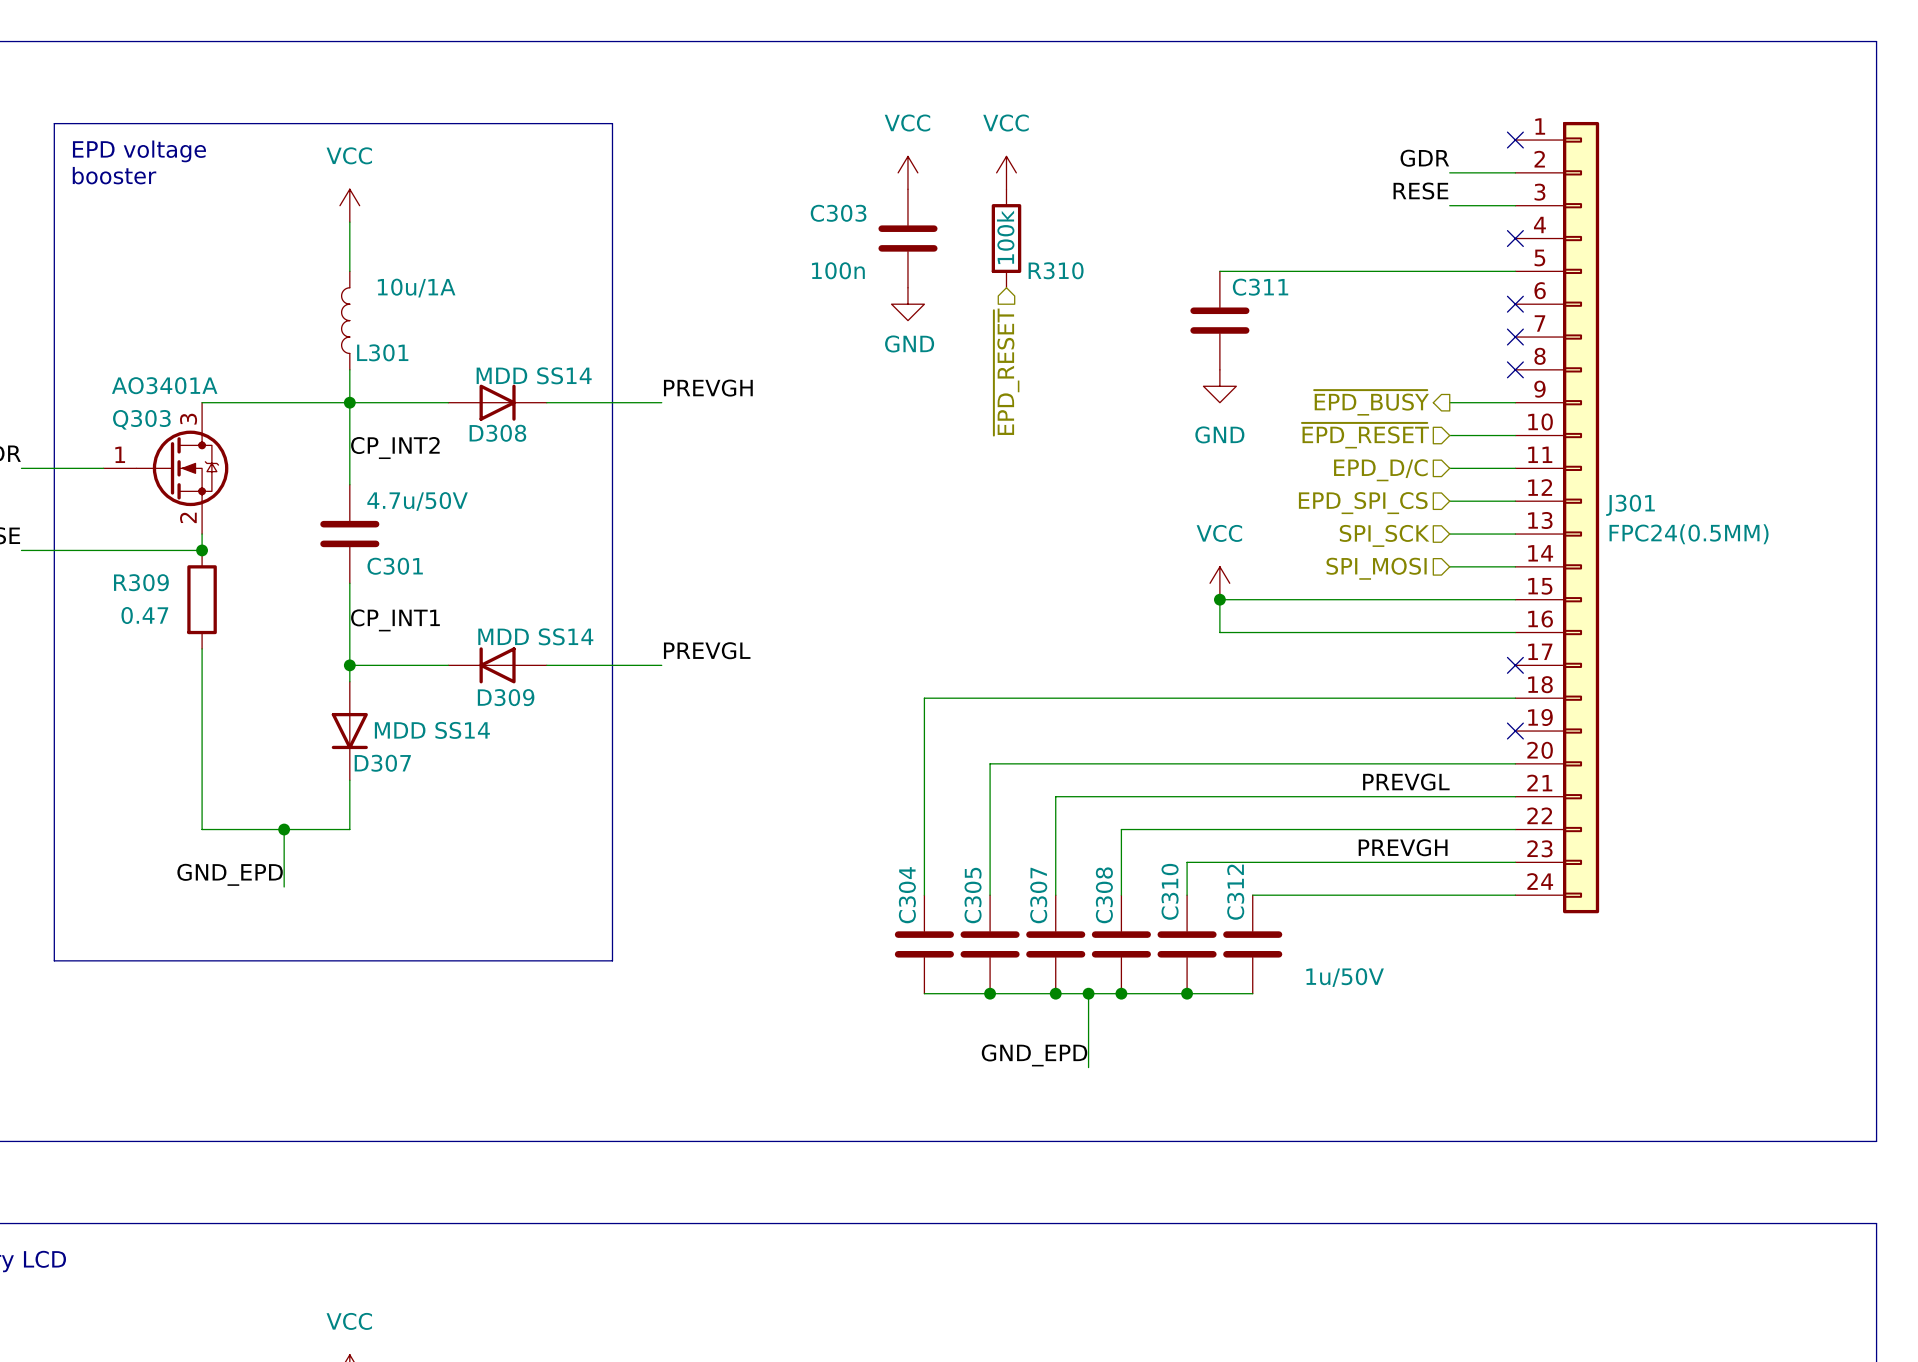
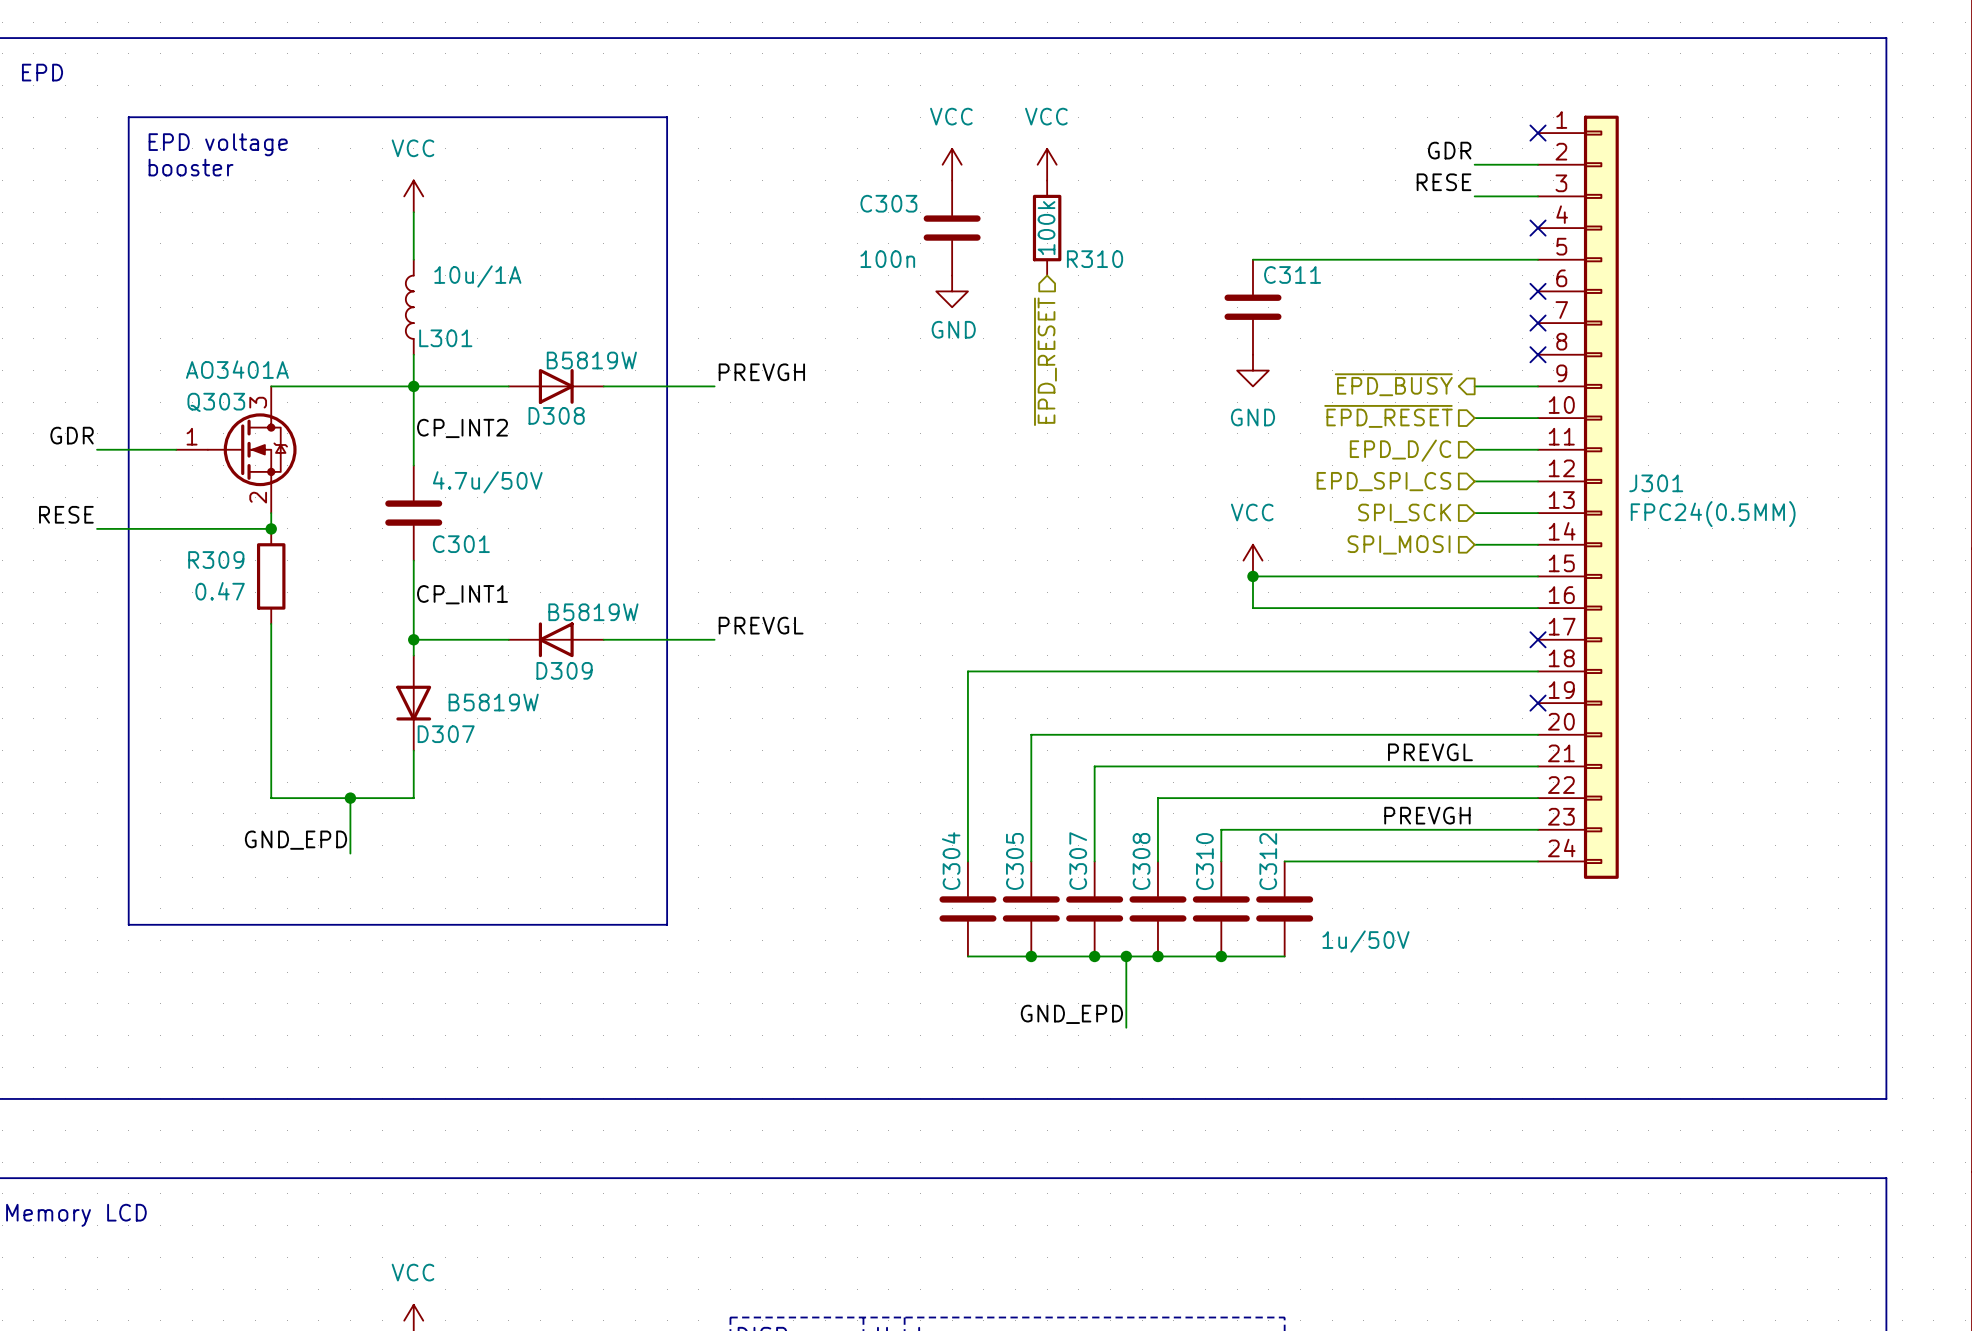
D308 value: MDD SS14 (534, 375) -> B5819W (591, 360)
D309 value: MDD SS14 (535, 636) -> B5819W (593, 612)
D307 value: MDD SS14 (432, 730) -> B5819W (493, 702)

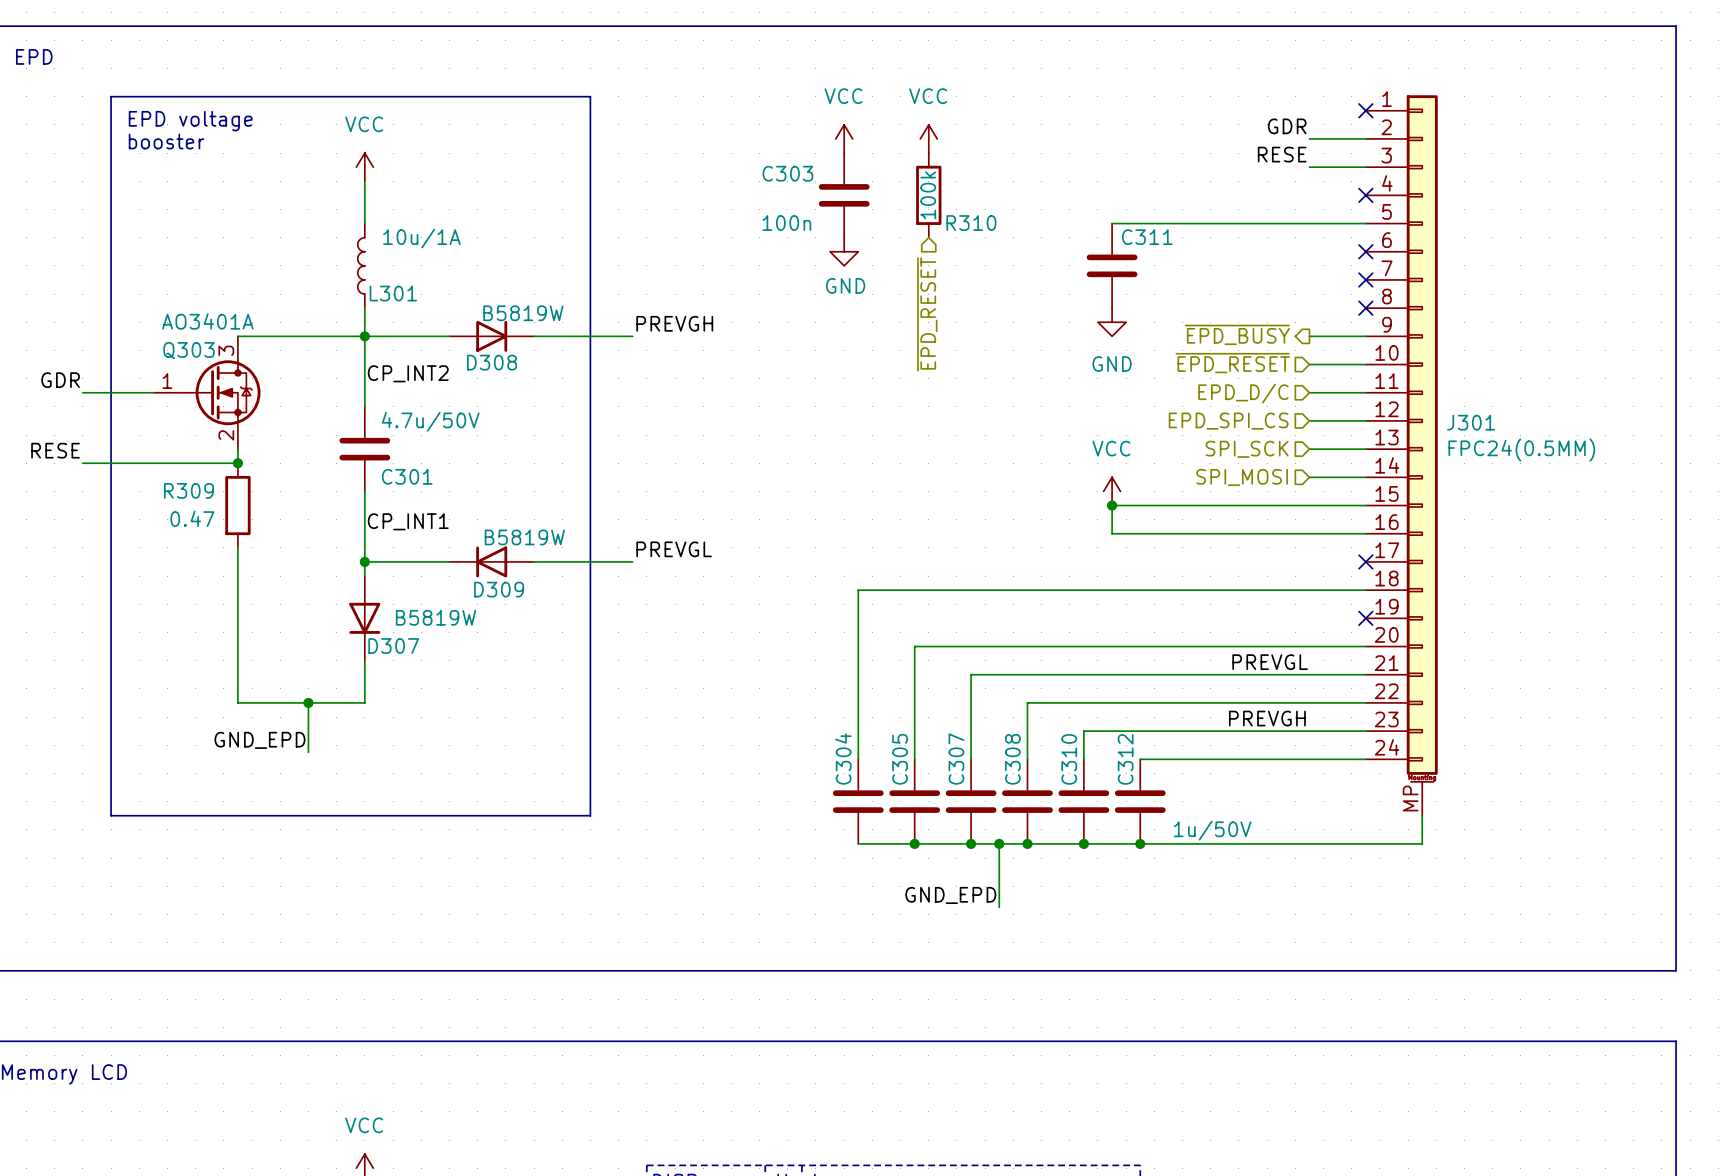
J301 symbol: [1538, 115, 1619, 879] -> [1365, 95, 1438, 816]
wire: none -> (1422, 815) (1422, 843) (1140, 843)
junction: none -> (1140, 843)

